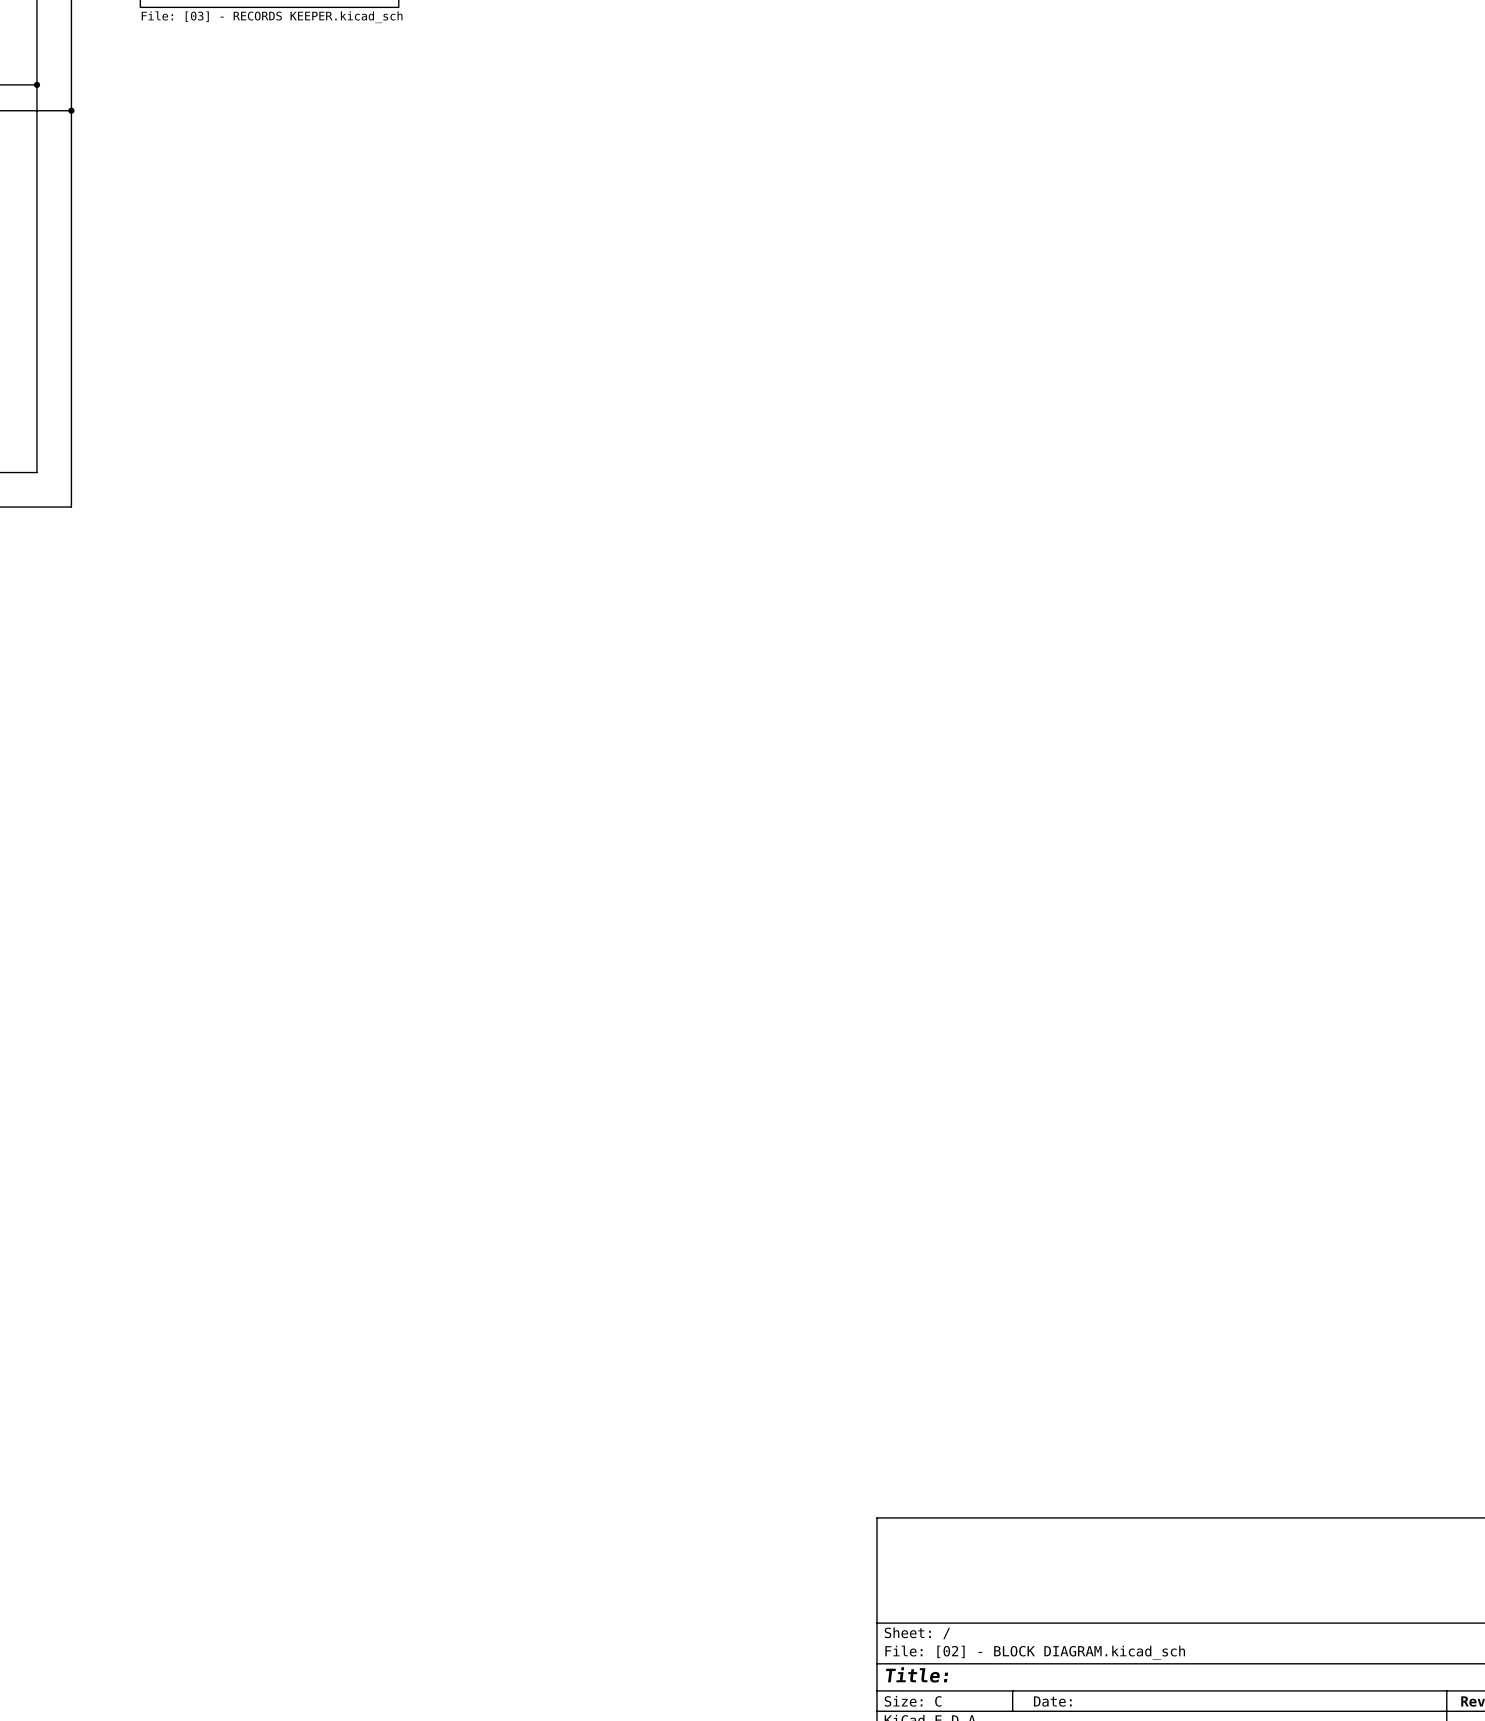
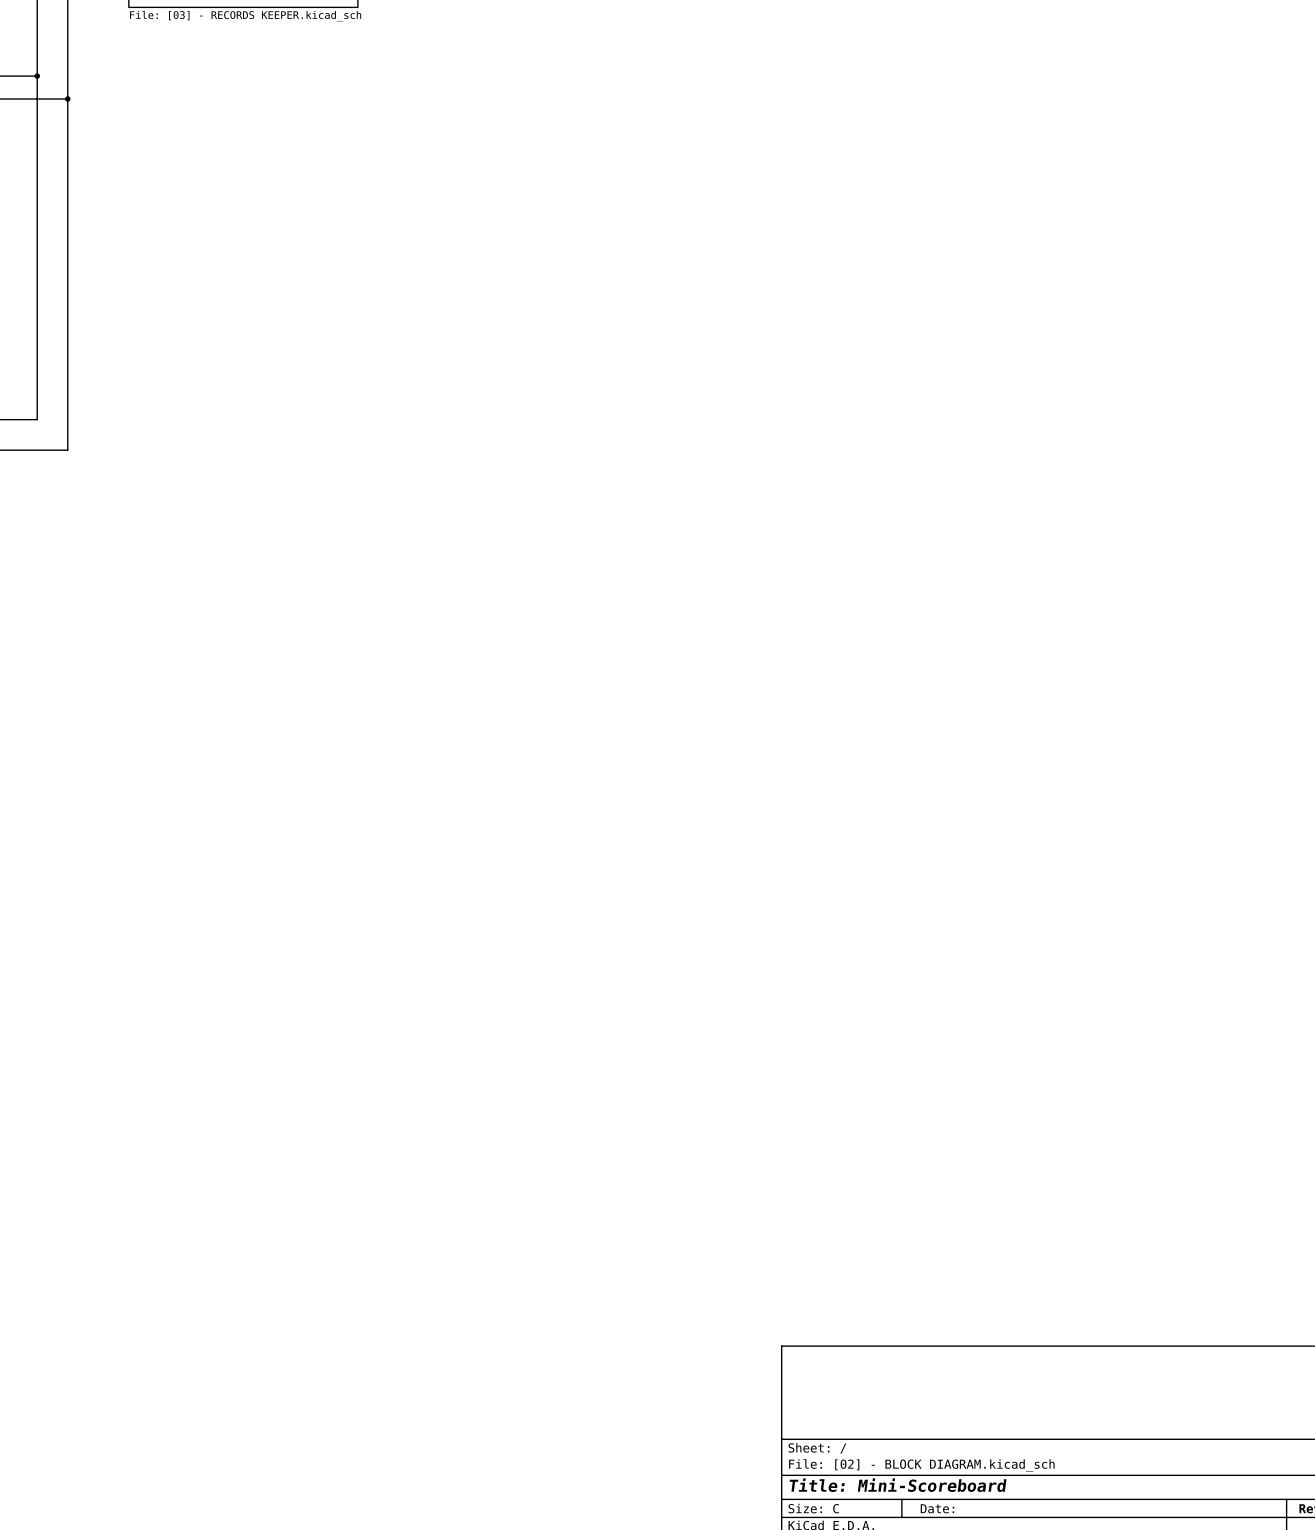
title block: Title: (917, 1674) -> Title: Mini-Scoreboard (898, 1485)

